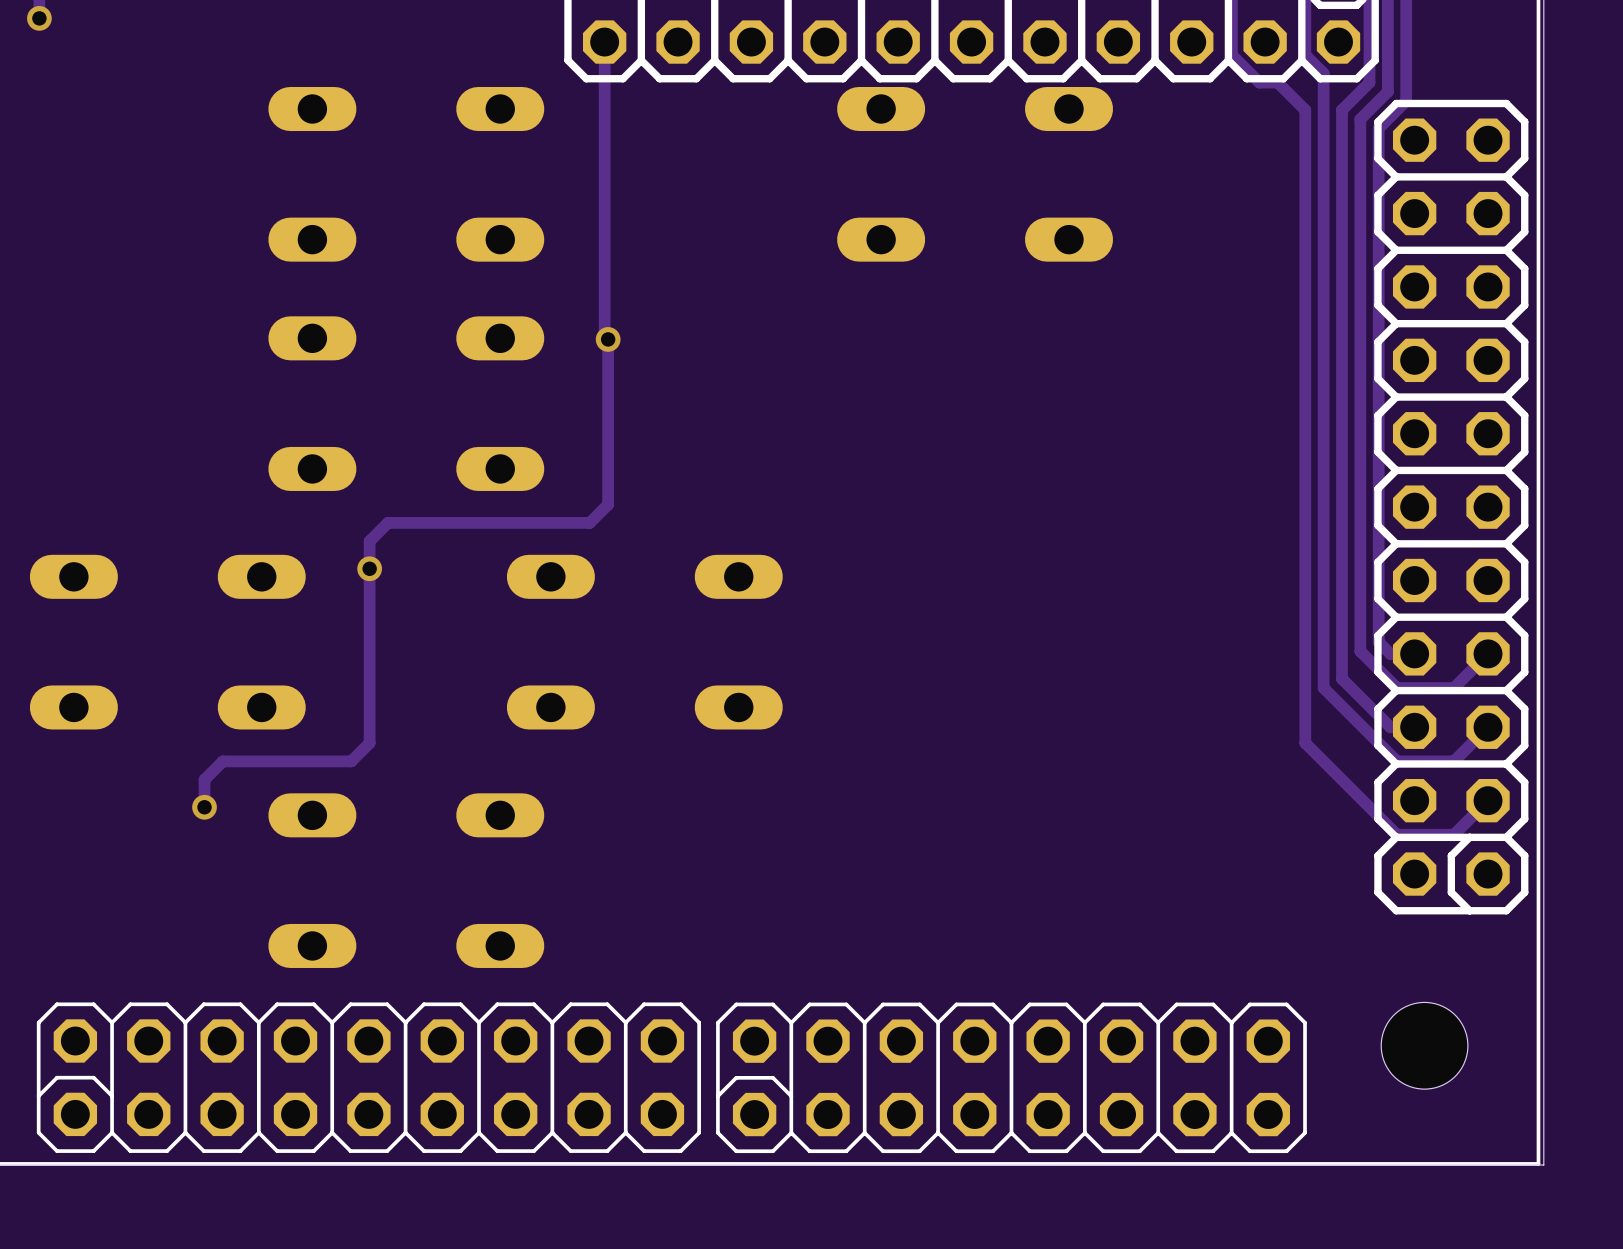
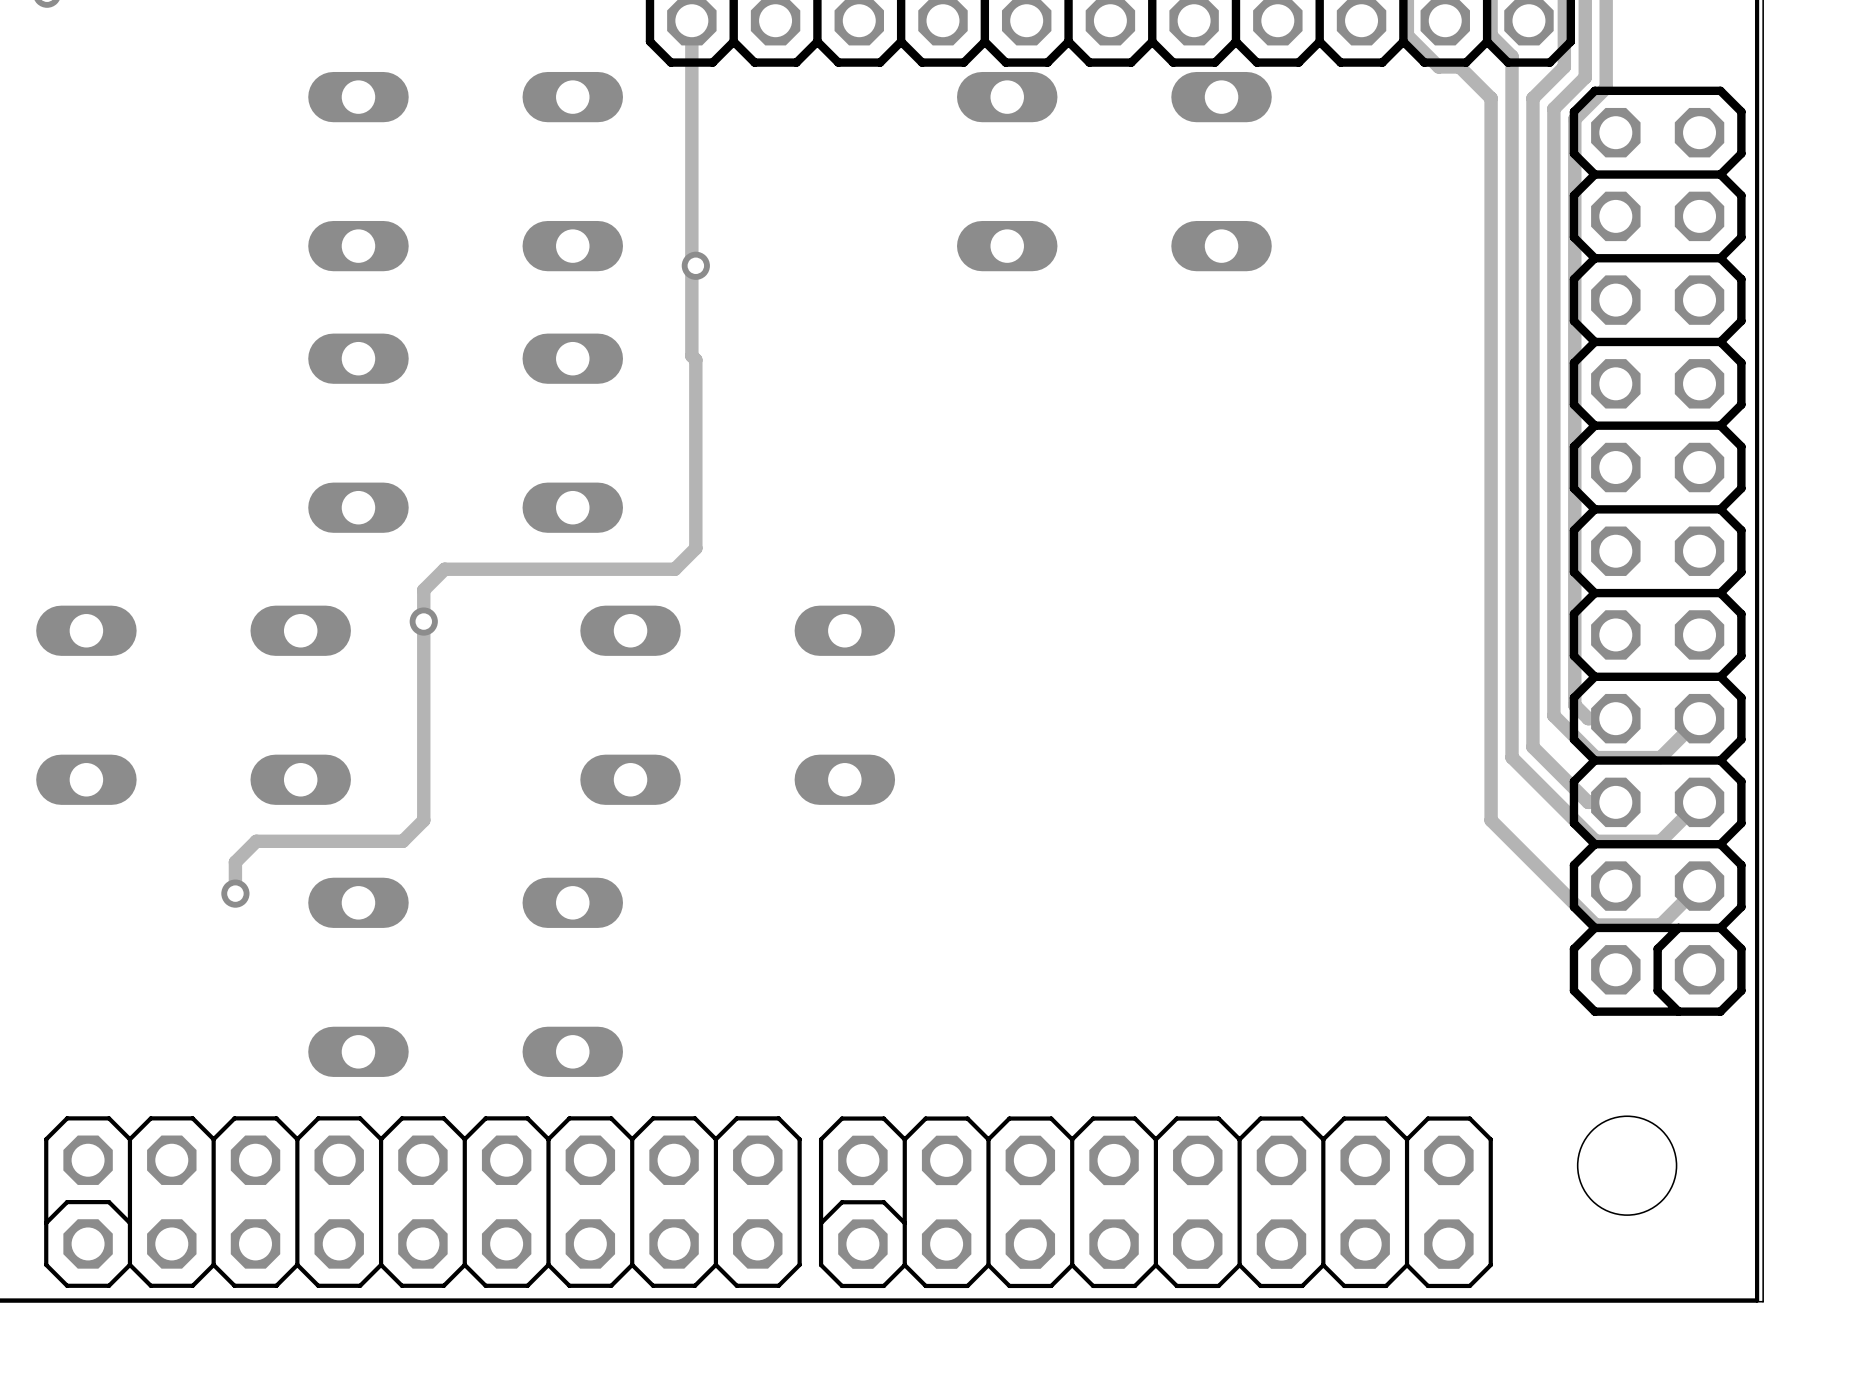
via position: (608, 339) -> (695, 265)

